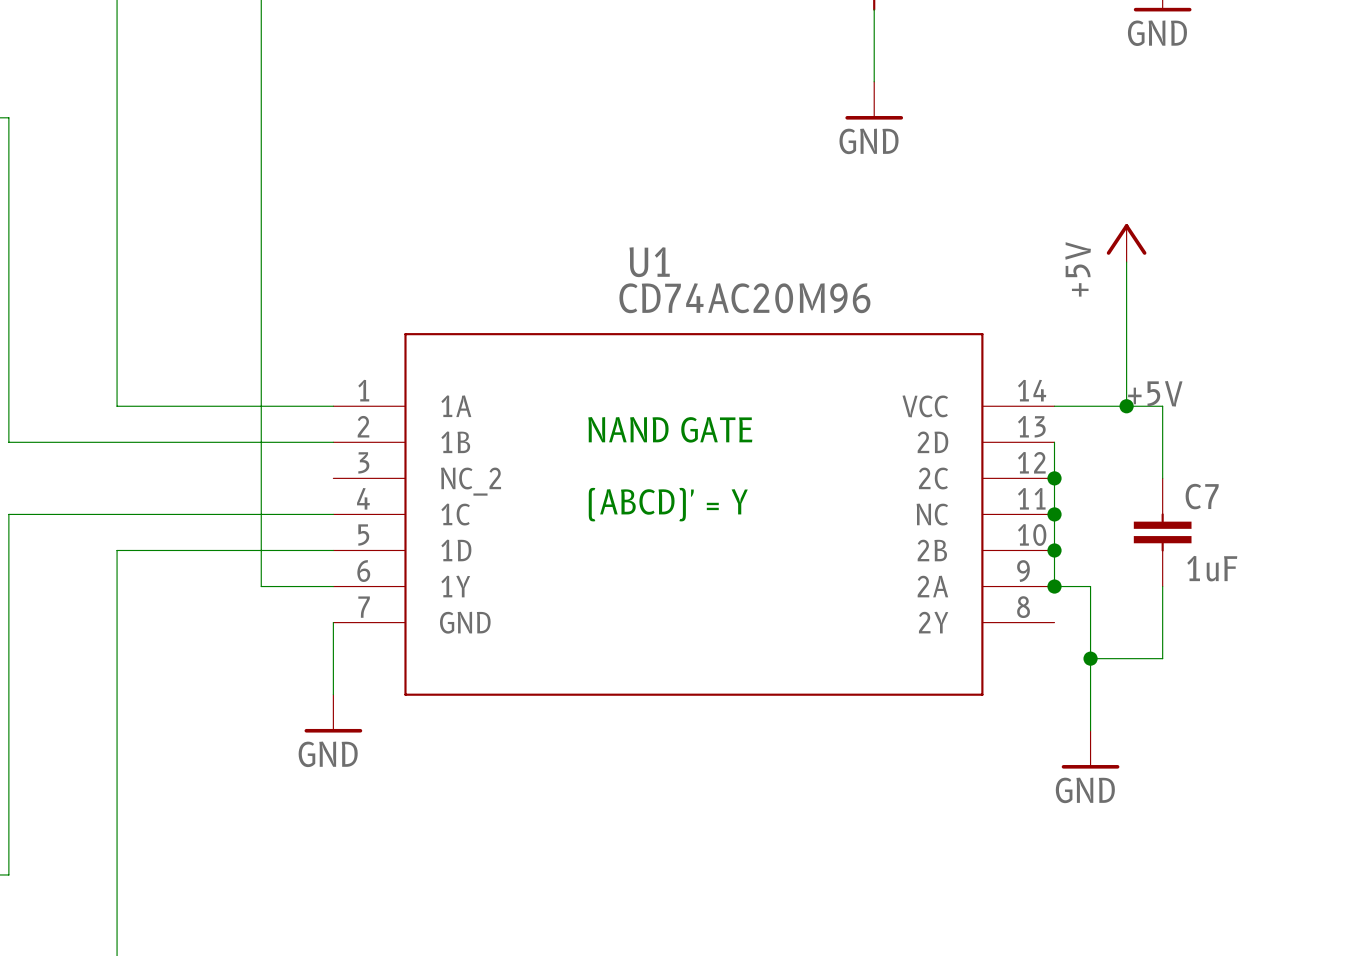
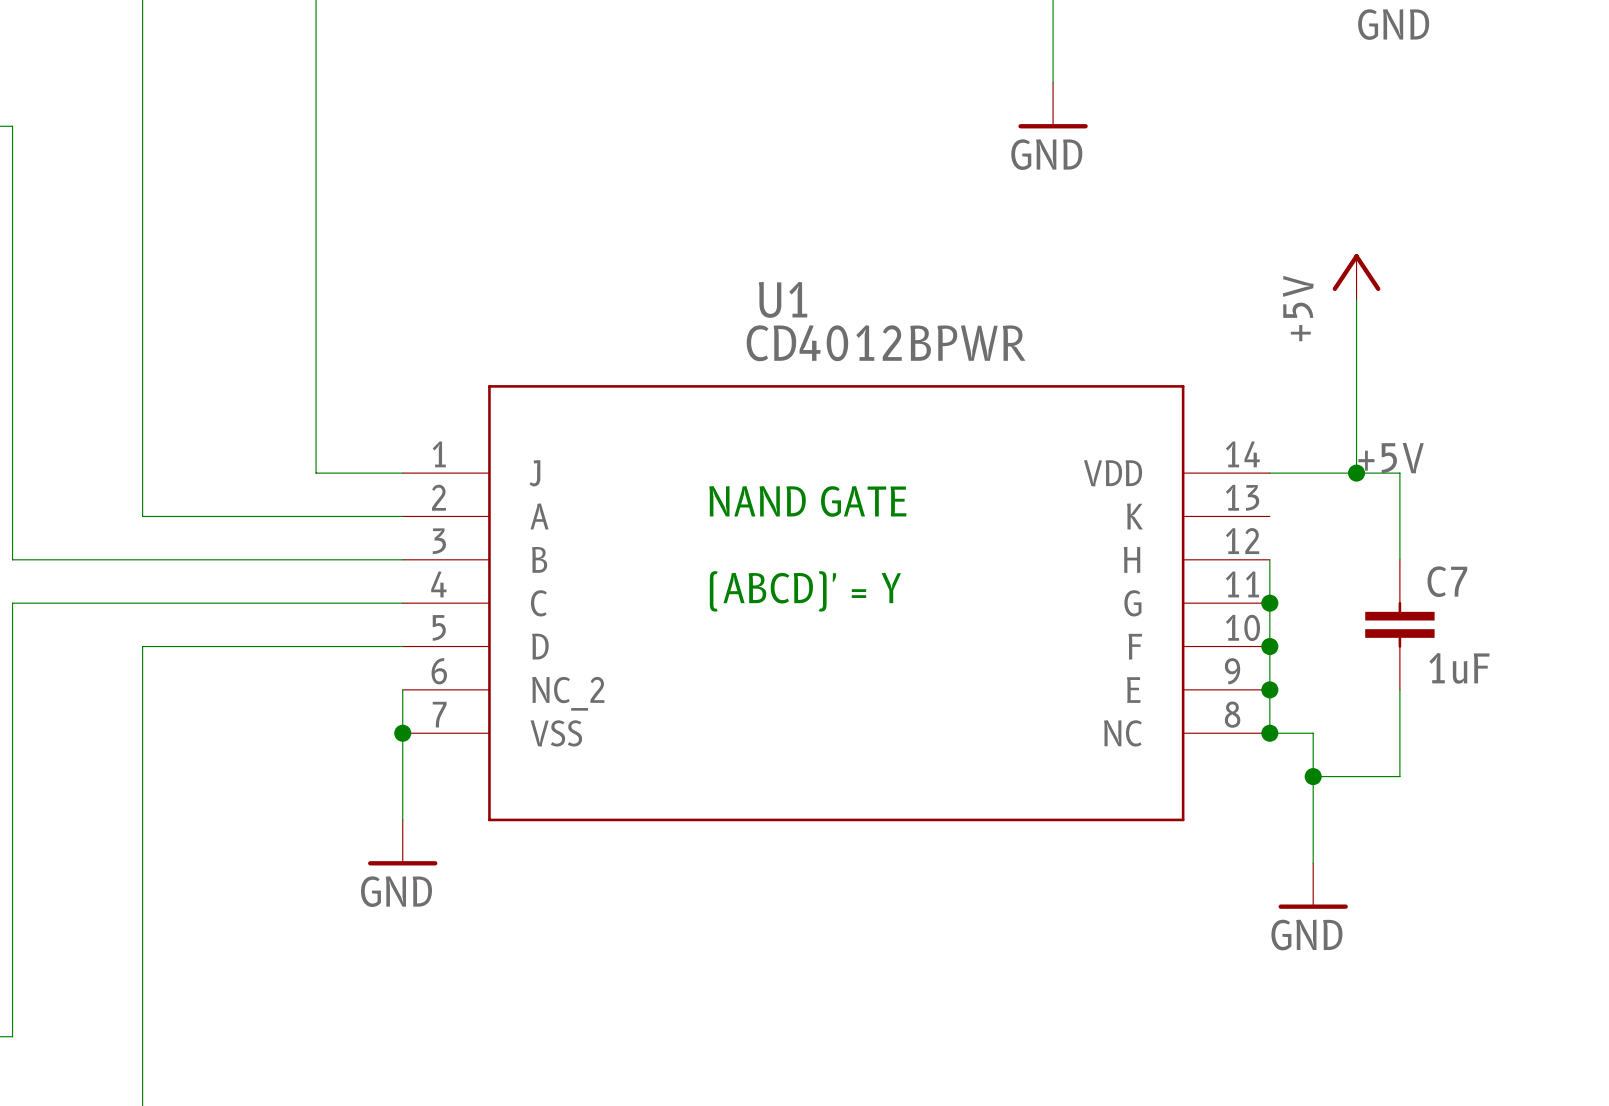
U1 value: CD74AC20M96 (744, 298) -> CD4012BPWR (886, 343)
U1 symbol: [333, 333, 1055, 696] -> [402, 385, 1270, 822]
wire: (117, 406) (261, 406) (261, 586) (333, 586) -> (402, 733) (402, 689)
wire: (8, 442) (117, 442) -> (142, 473) (142, 516)
wire: none -> (12, 516) (12, 559) (402, 559)
wire: (1054, 442) (1054, 478) -> none
junction: (1054, 478) -> none
wire: (1054, 586) (1090, 586) (1090, 622) -> (1269, 689) (1269, 733) (1313, 733)
junction: none -> (402, 733)
junction: none -> (1269, 733)

